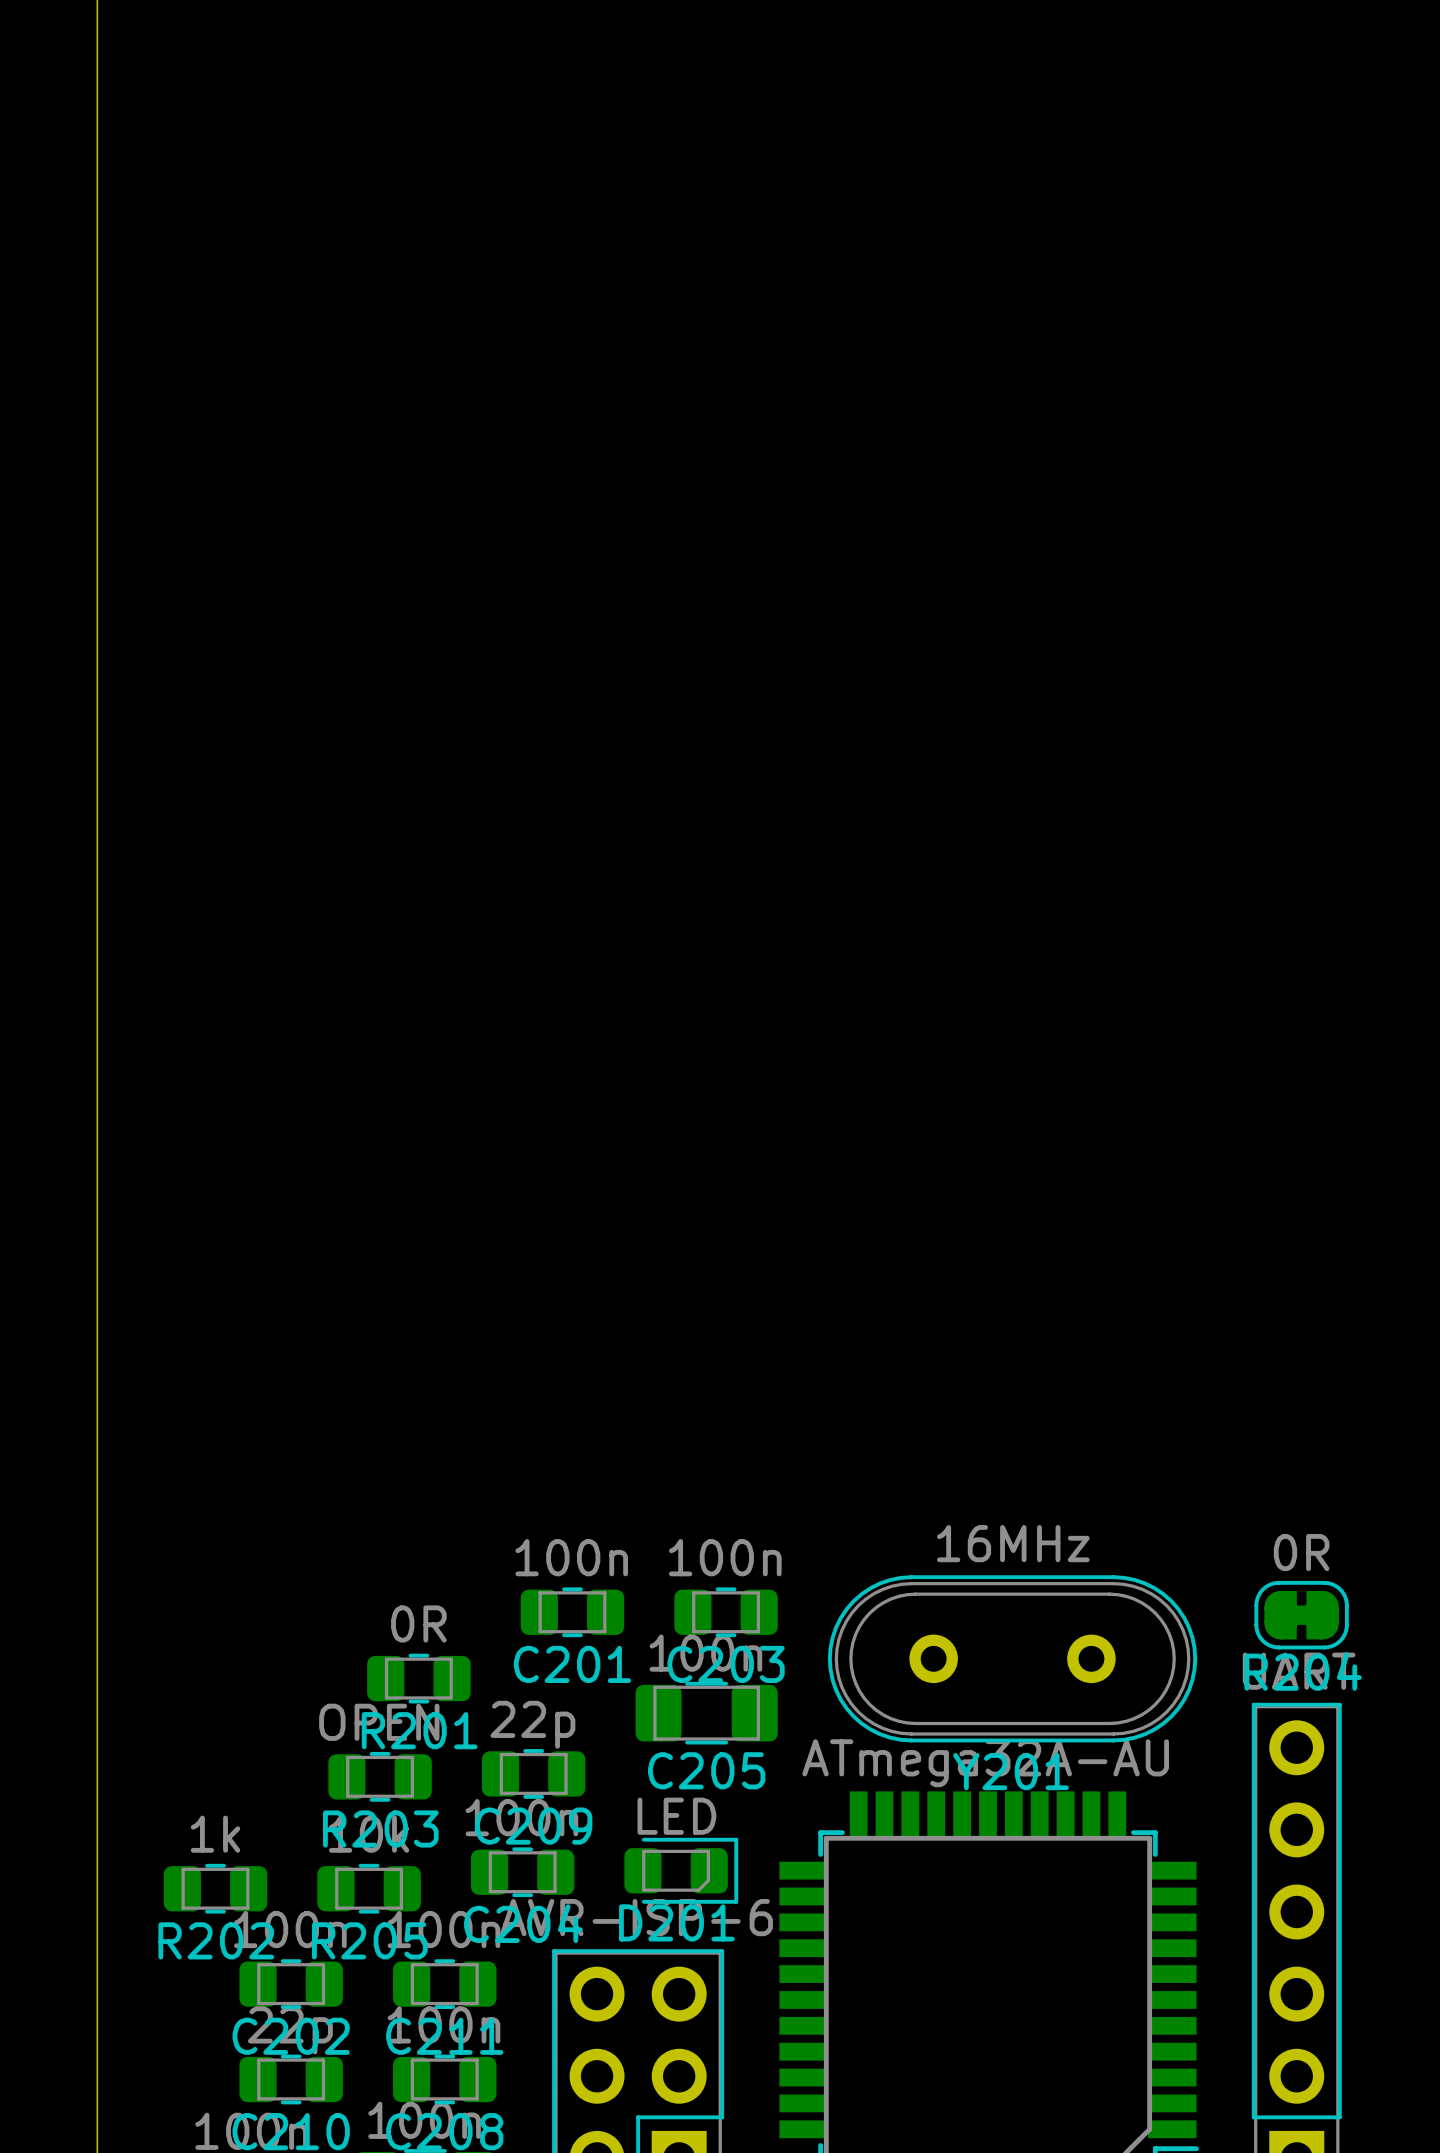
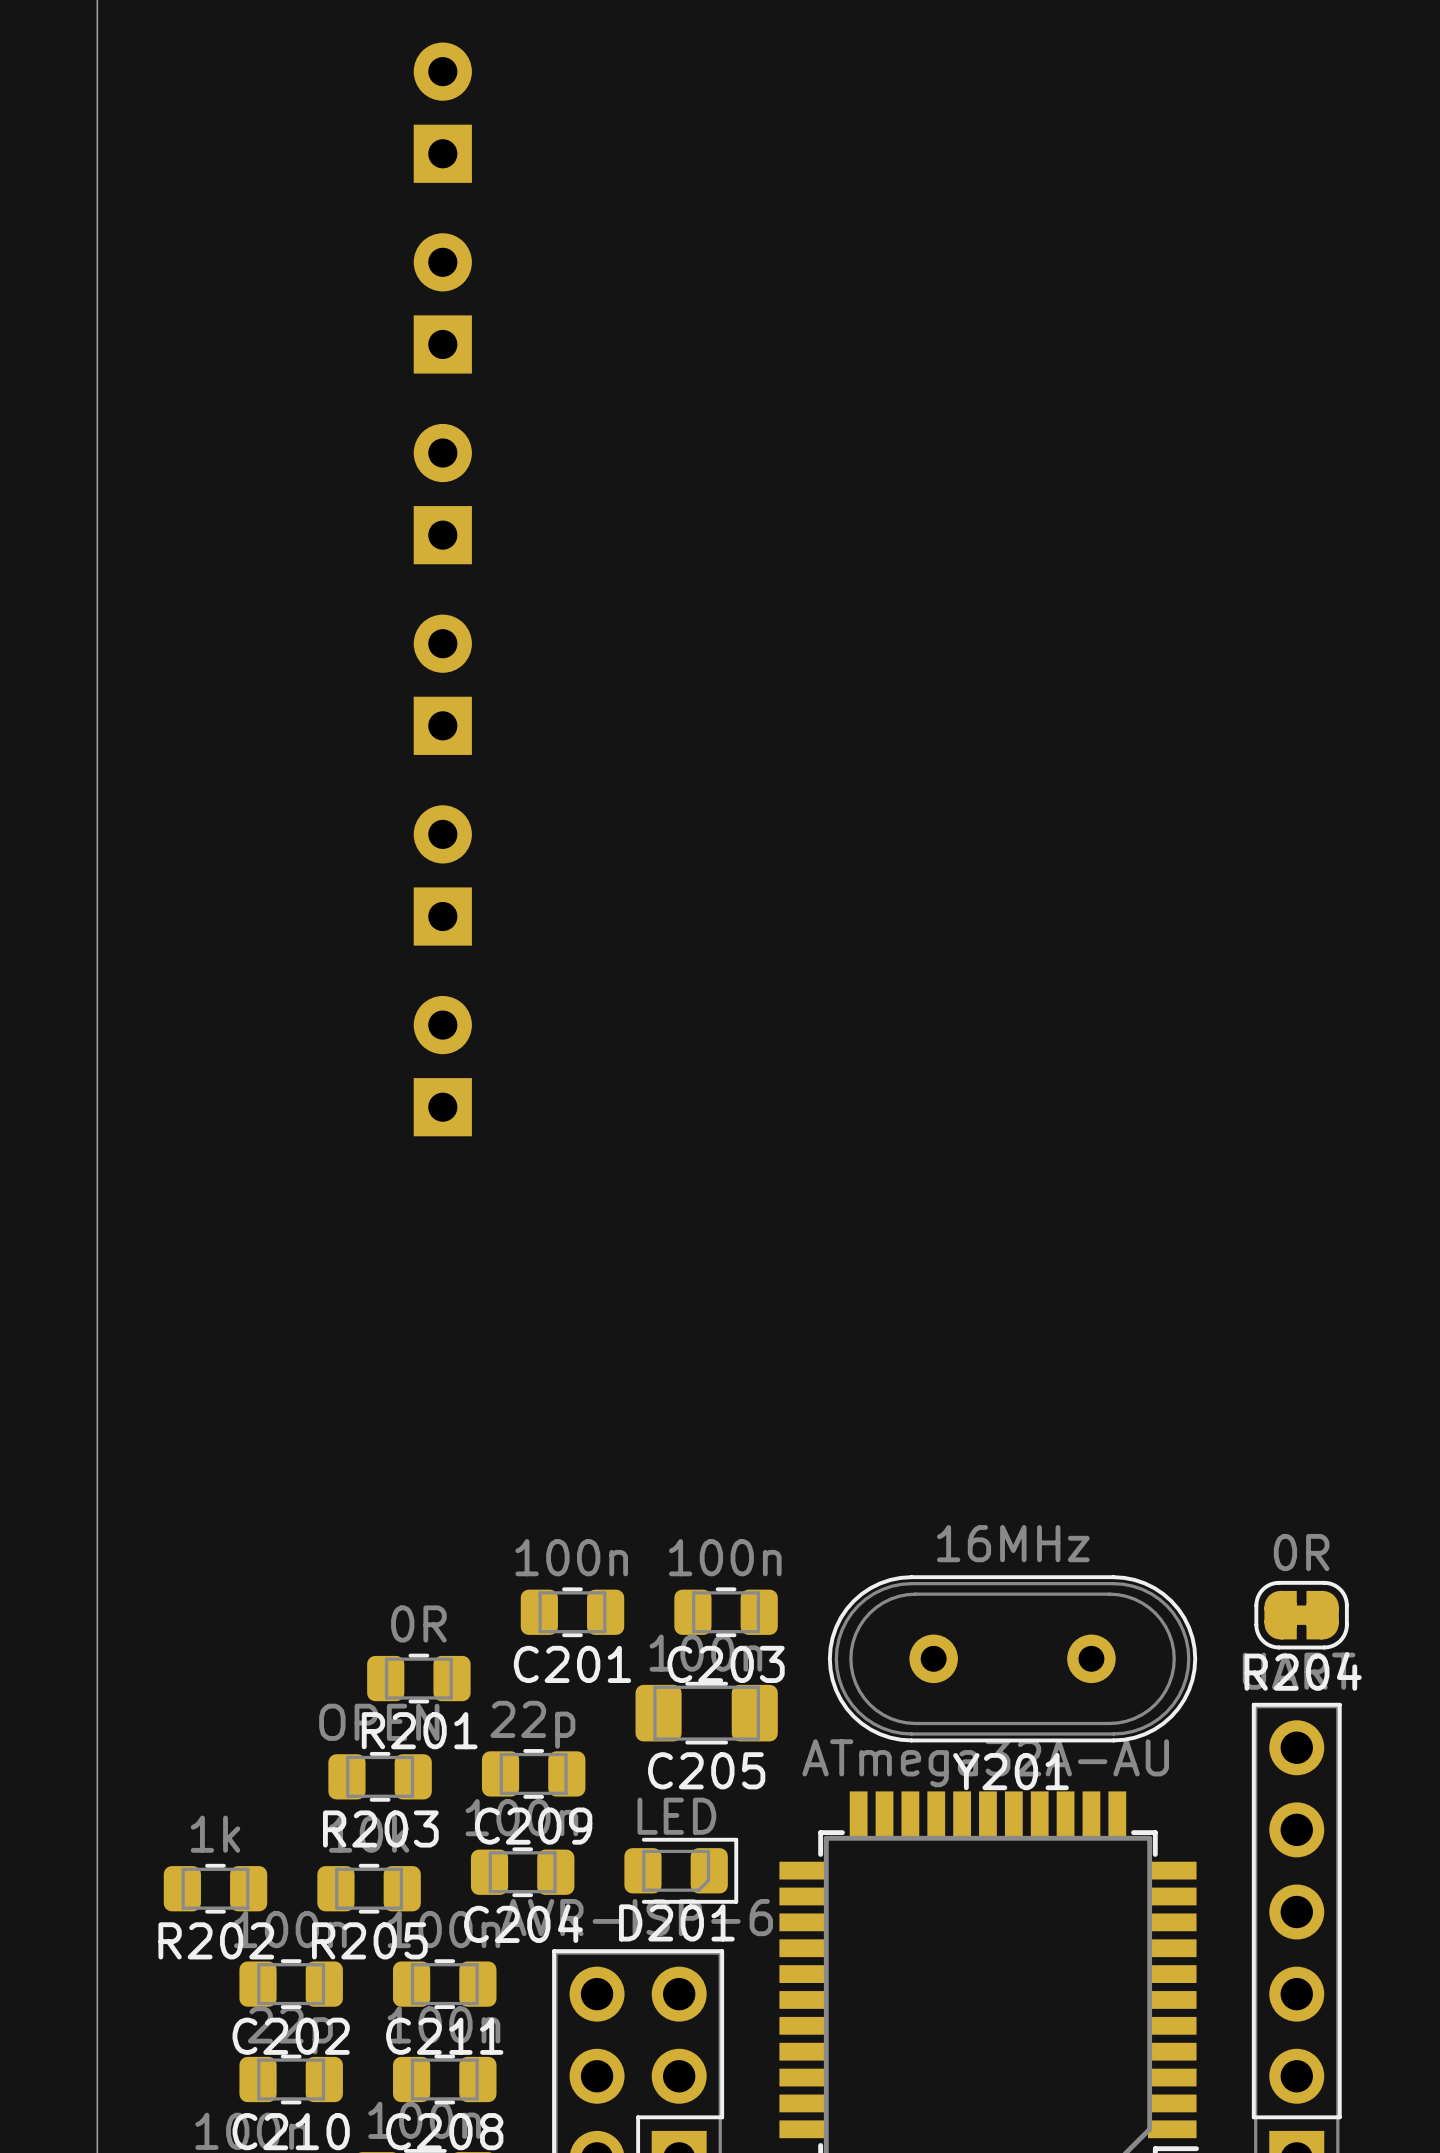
part: none -> (442, 112)
part: none -> (442, 303)
part: none -> (442, 494)
part: none -> (442, 684)
part: none -> (442, 875)
part: none -> (442, 1066)

